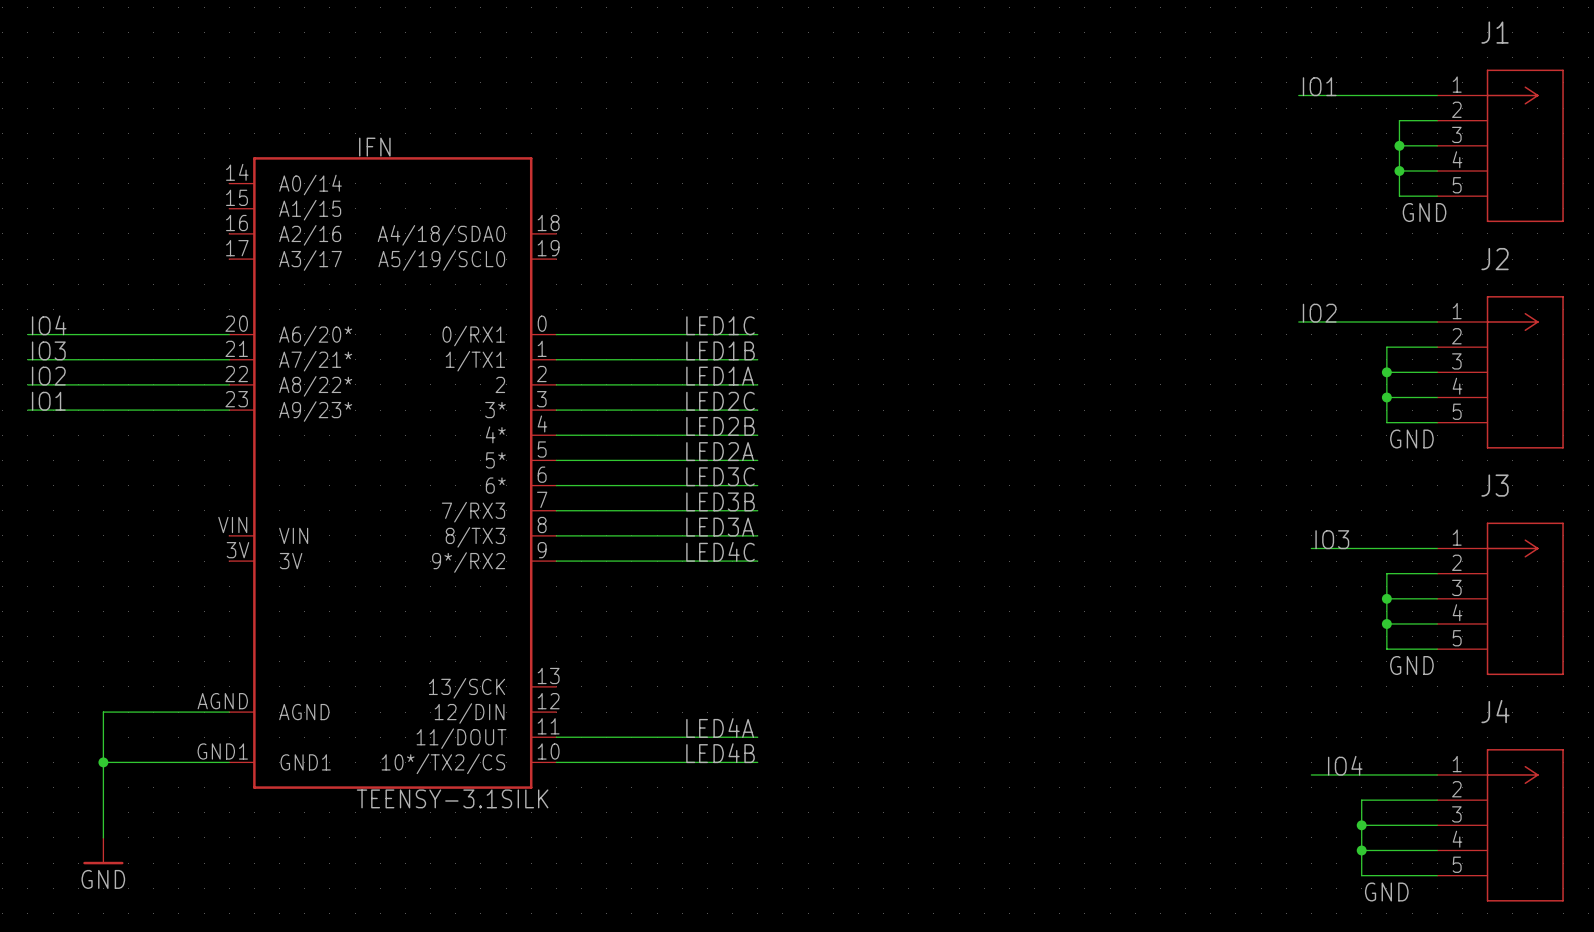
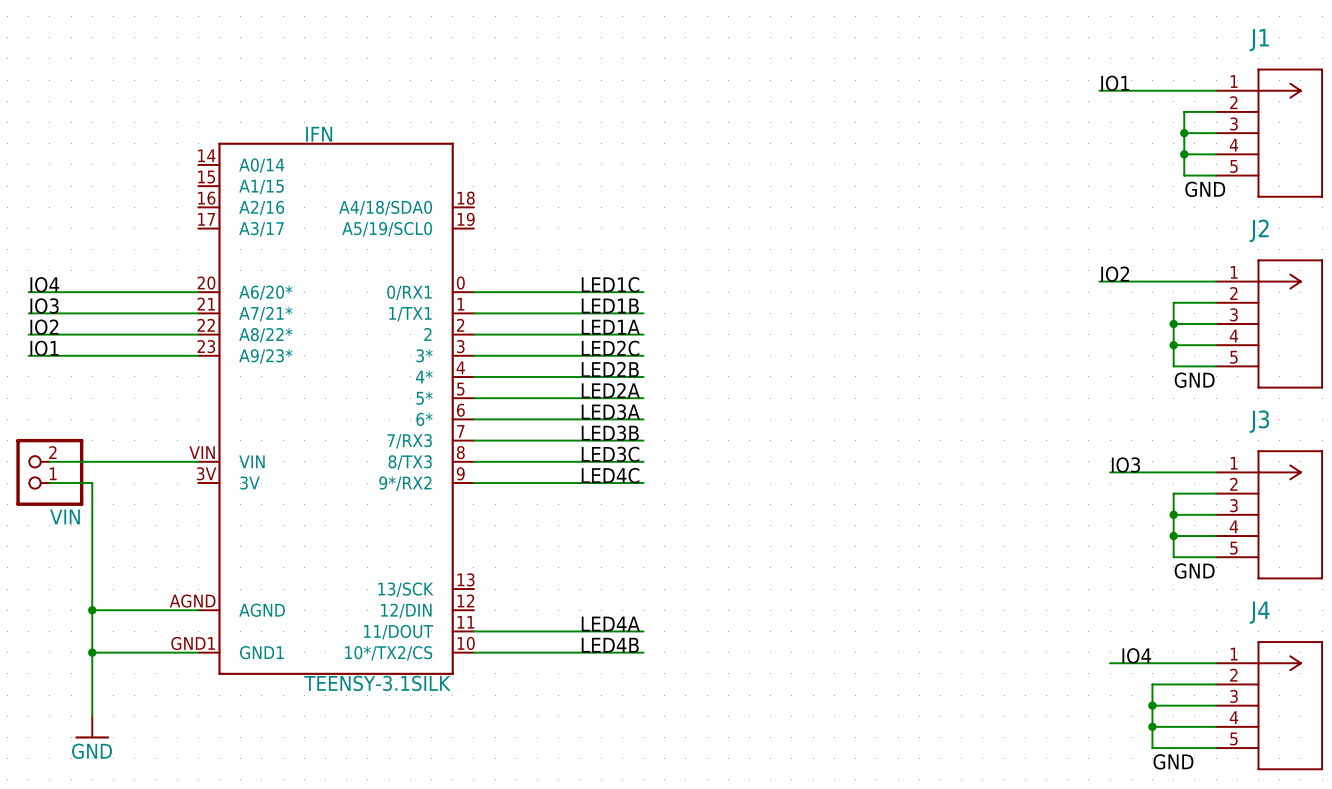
label: LED3C (720, 476) -> LED3A (610, 411)
label: LED3A (720, 527) -> LED3C (610, 454)
wire: none -> (49, 461) (198, 461)
VIN: none -> (49, 472)
wire: none -> (49, 483) (92, 483) (92, 610)
junction: none -> (92, 610)

